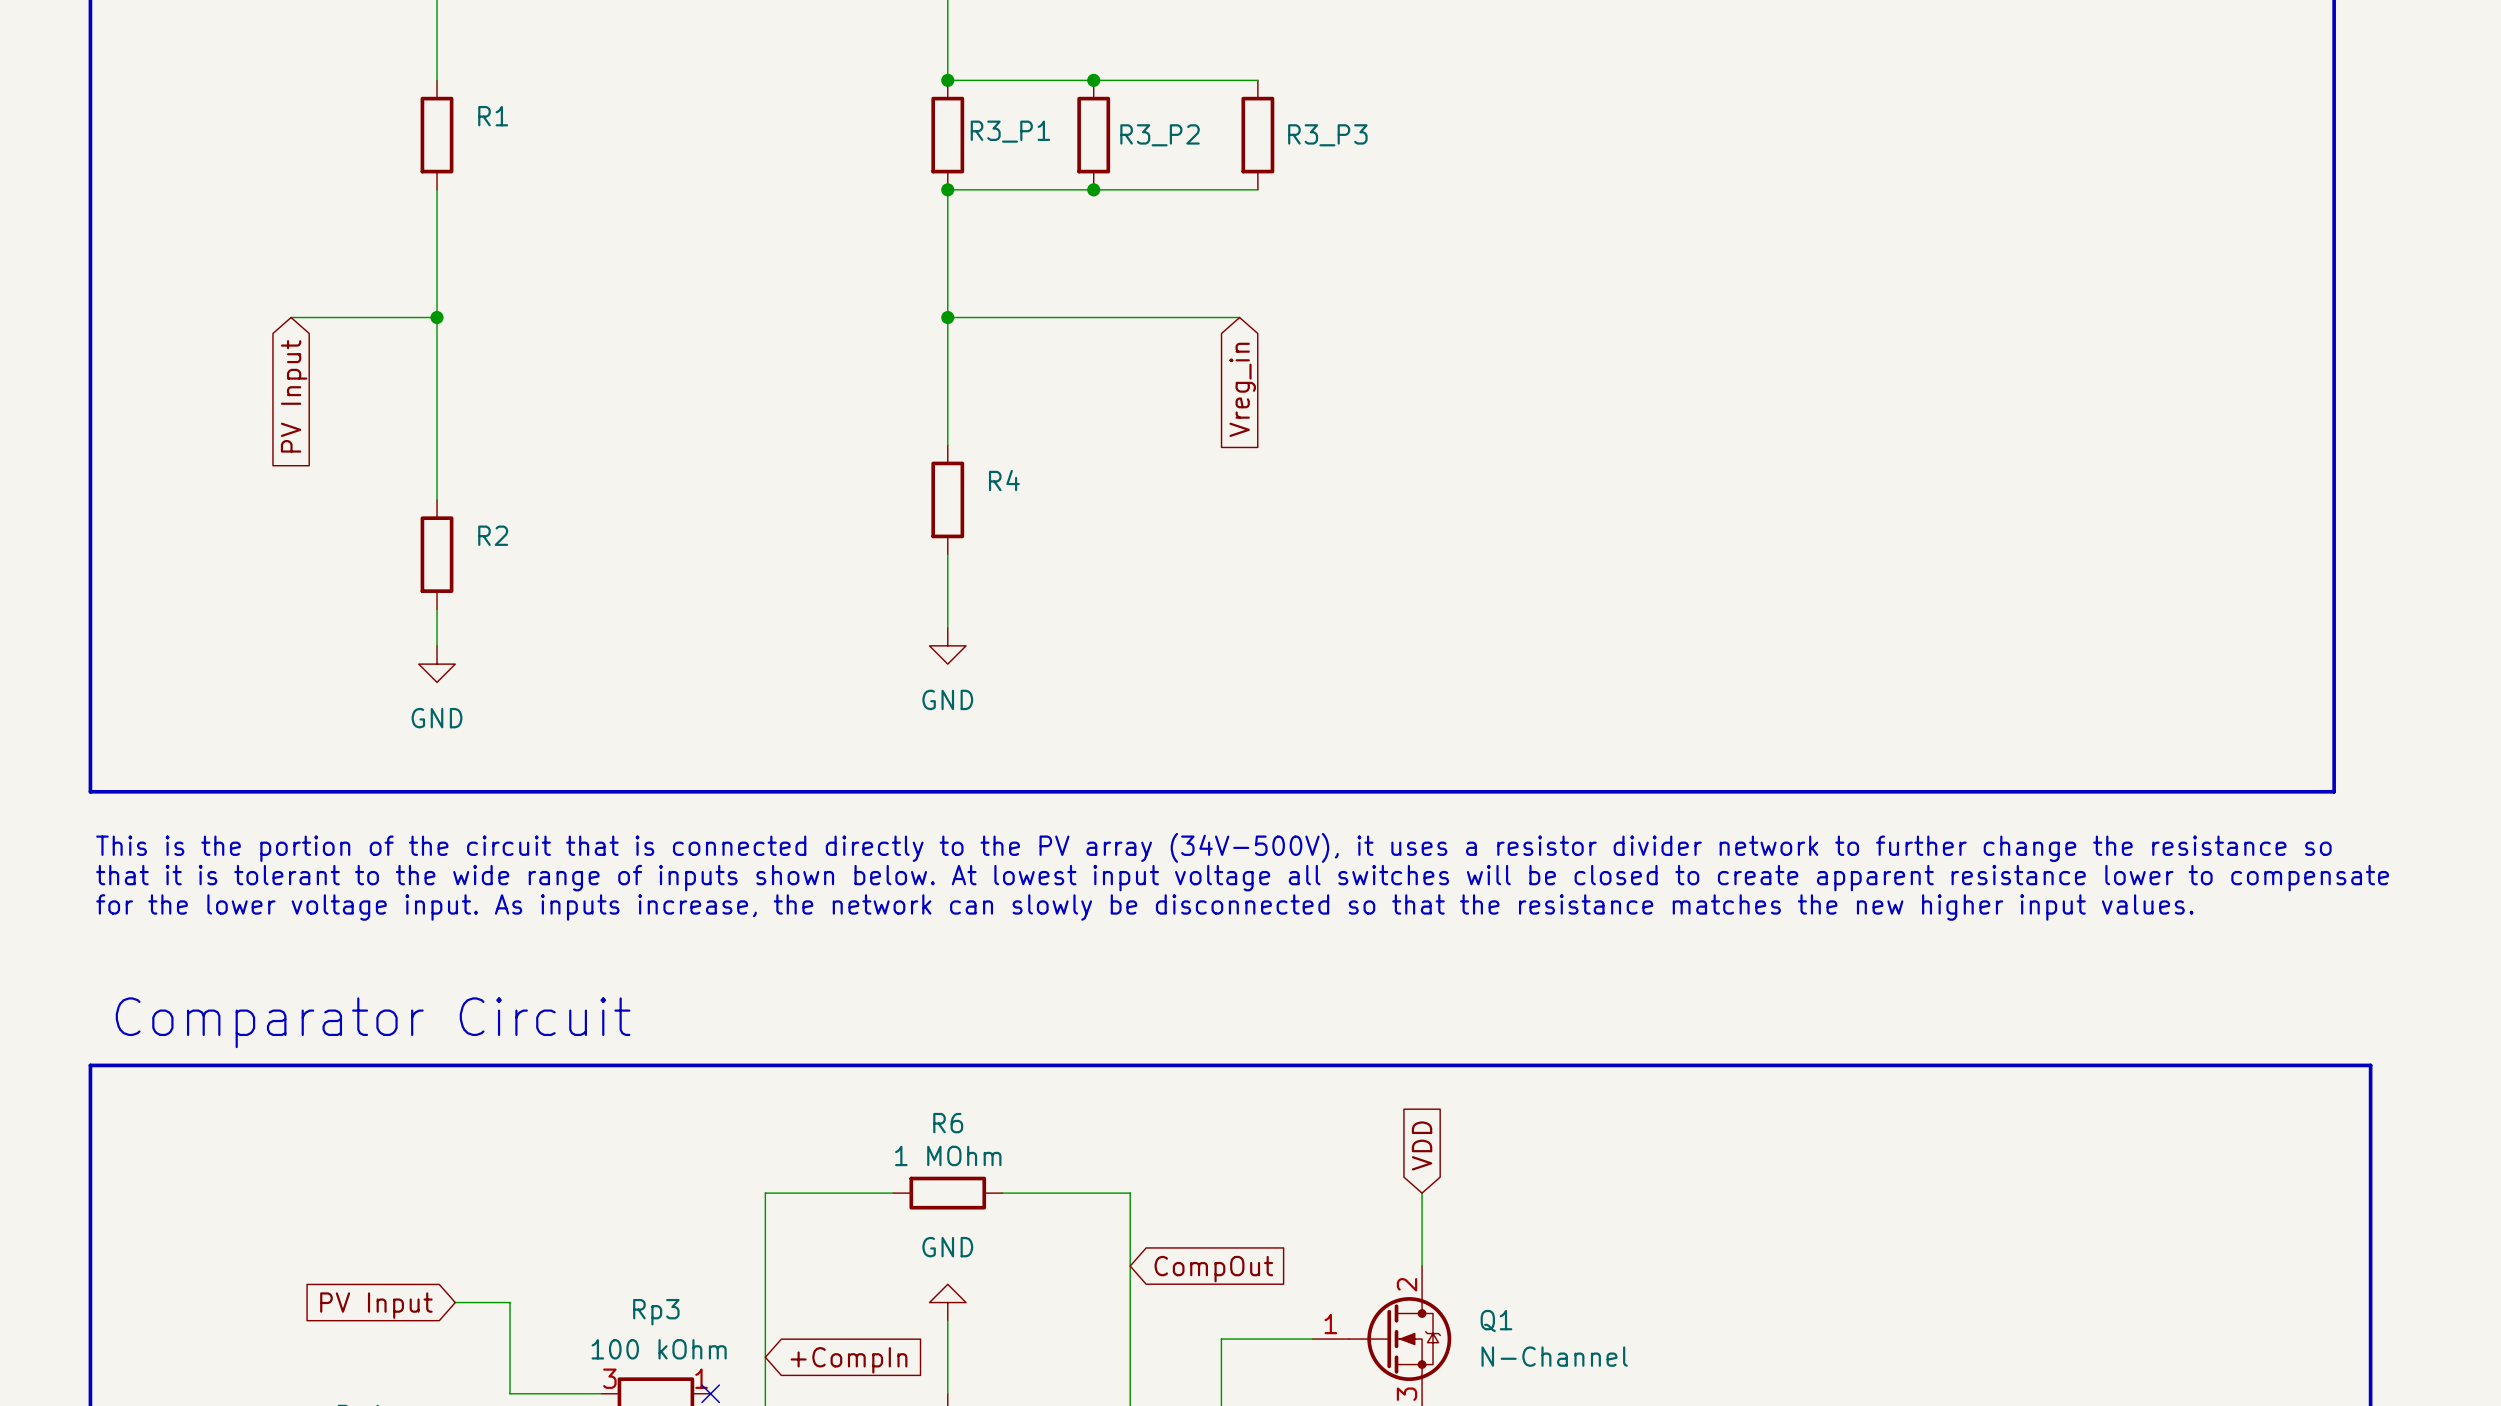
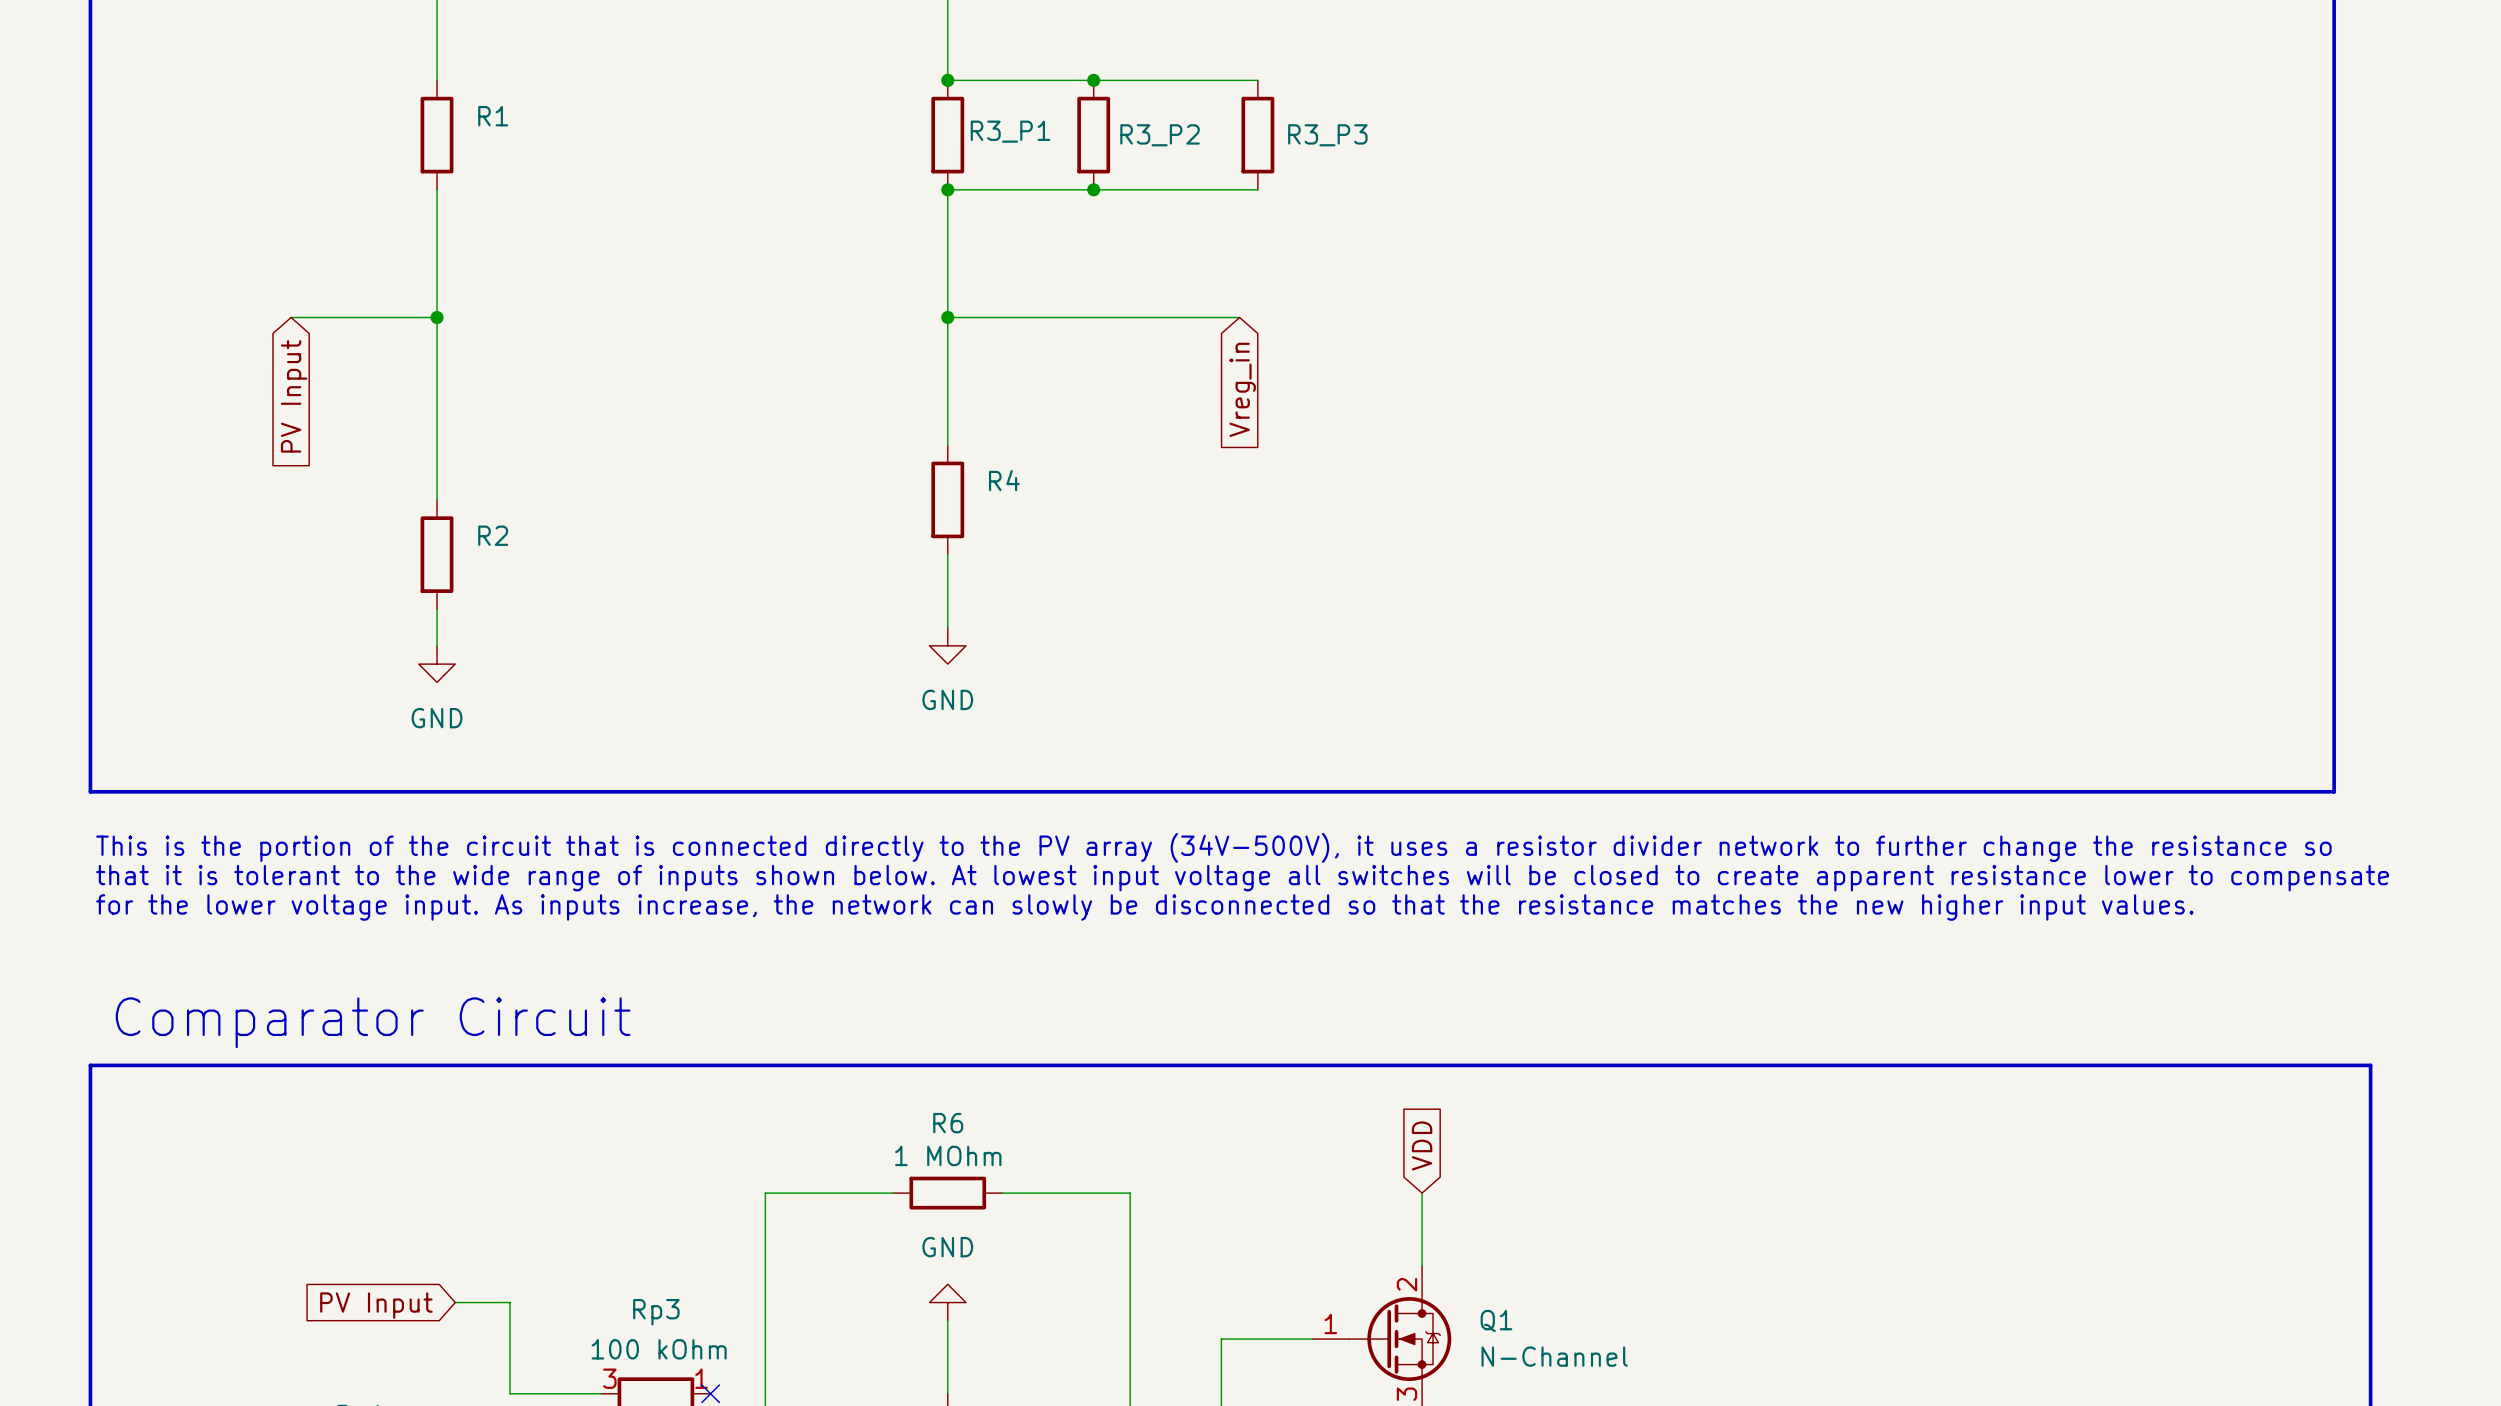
global label: CompOut (1213, 1269) -> none
global label: +CompIn (849, 1360) -> none

